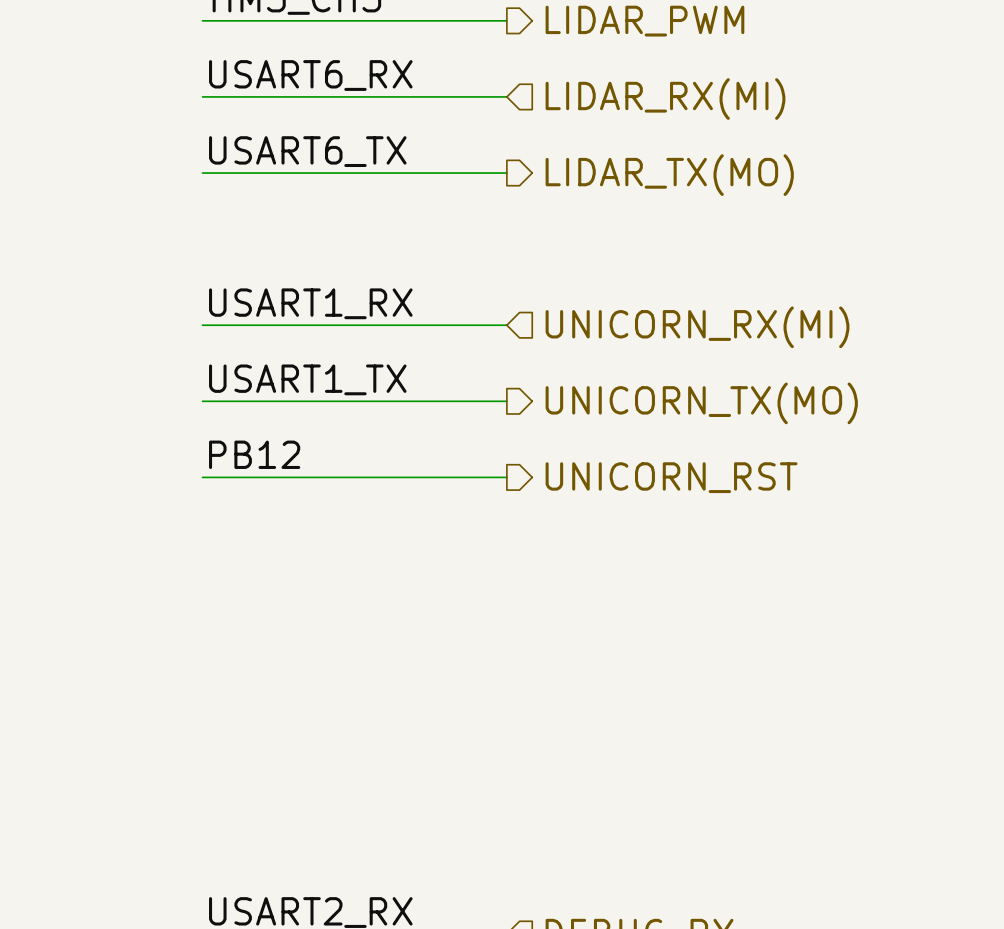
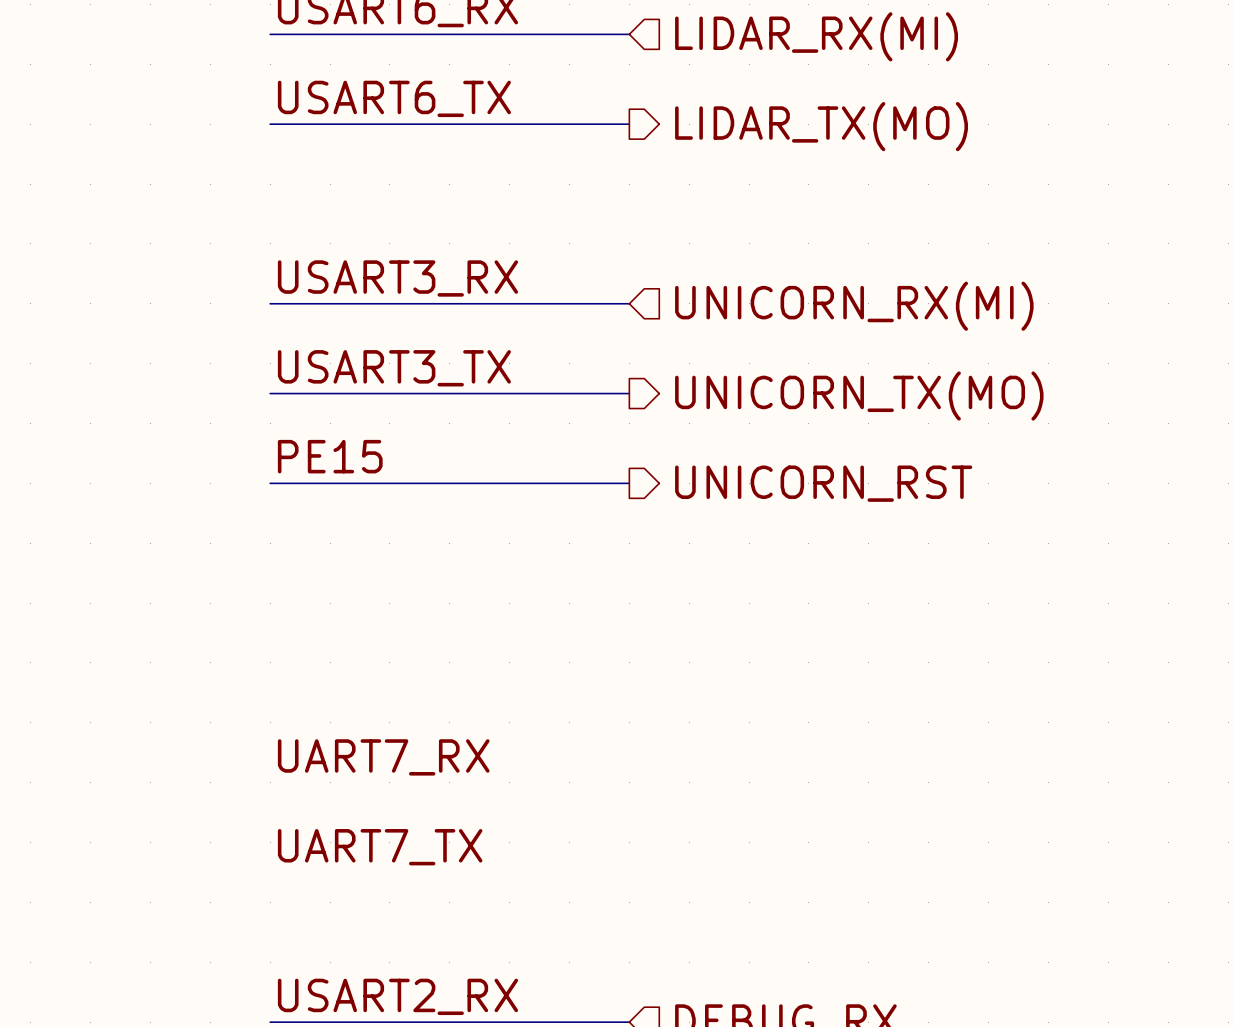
label: USART1_RX (310, 303) -> USART3_RX (397, 278)
label: USART1_TX (307, 379) -> USART3_TX (394, 368)
label: PB12 (254, 454) -> PE15 (330, 456)
label: none -> UART7_RX (383, 757)
label: none -> UART7_TX (380, 847)

